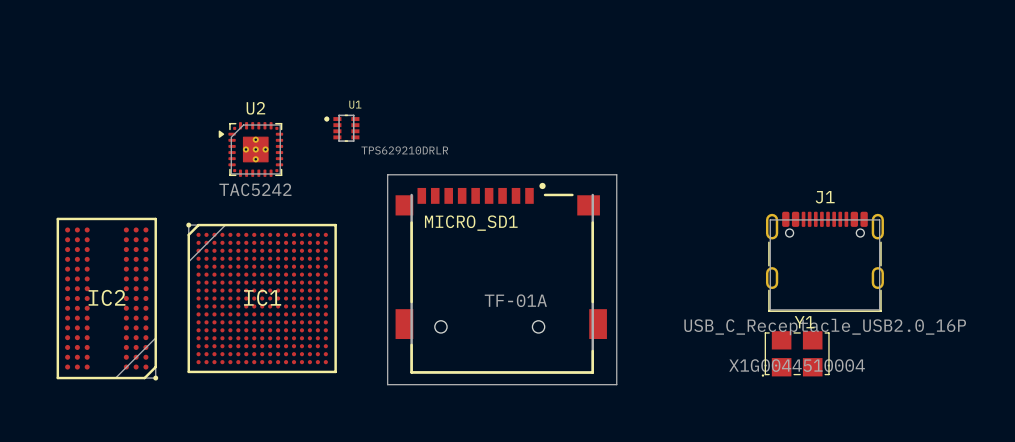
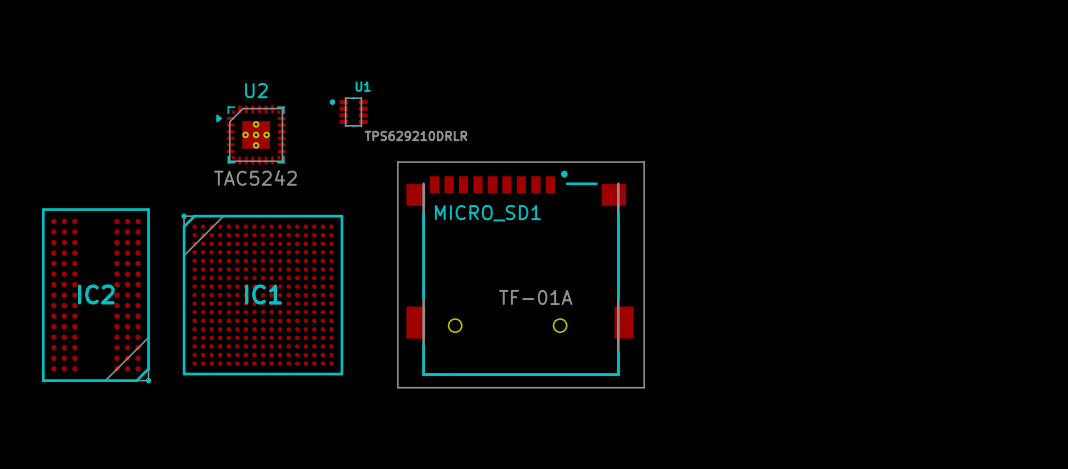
J1: USB_C_Receptacle_USB2.0_16P (824, 261) -> none
Y1: X1G0044510004 (795, 353) -> none

